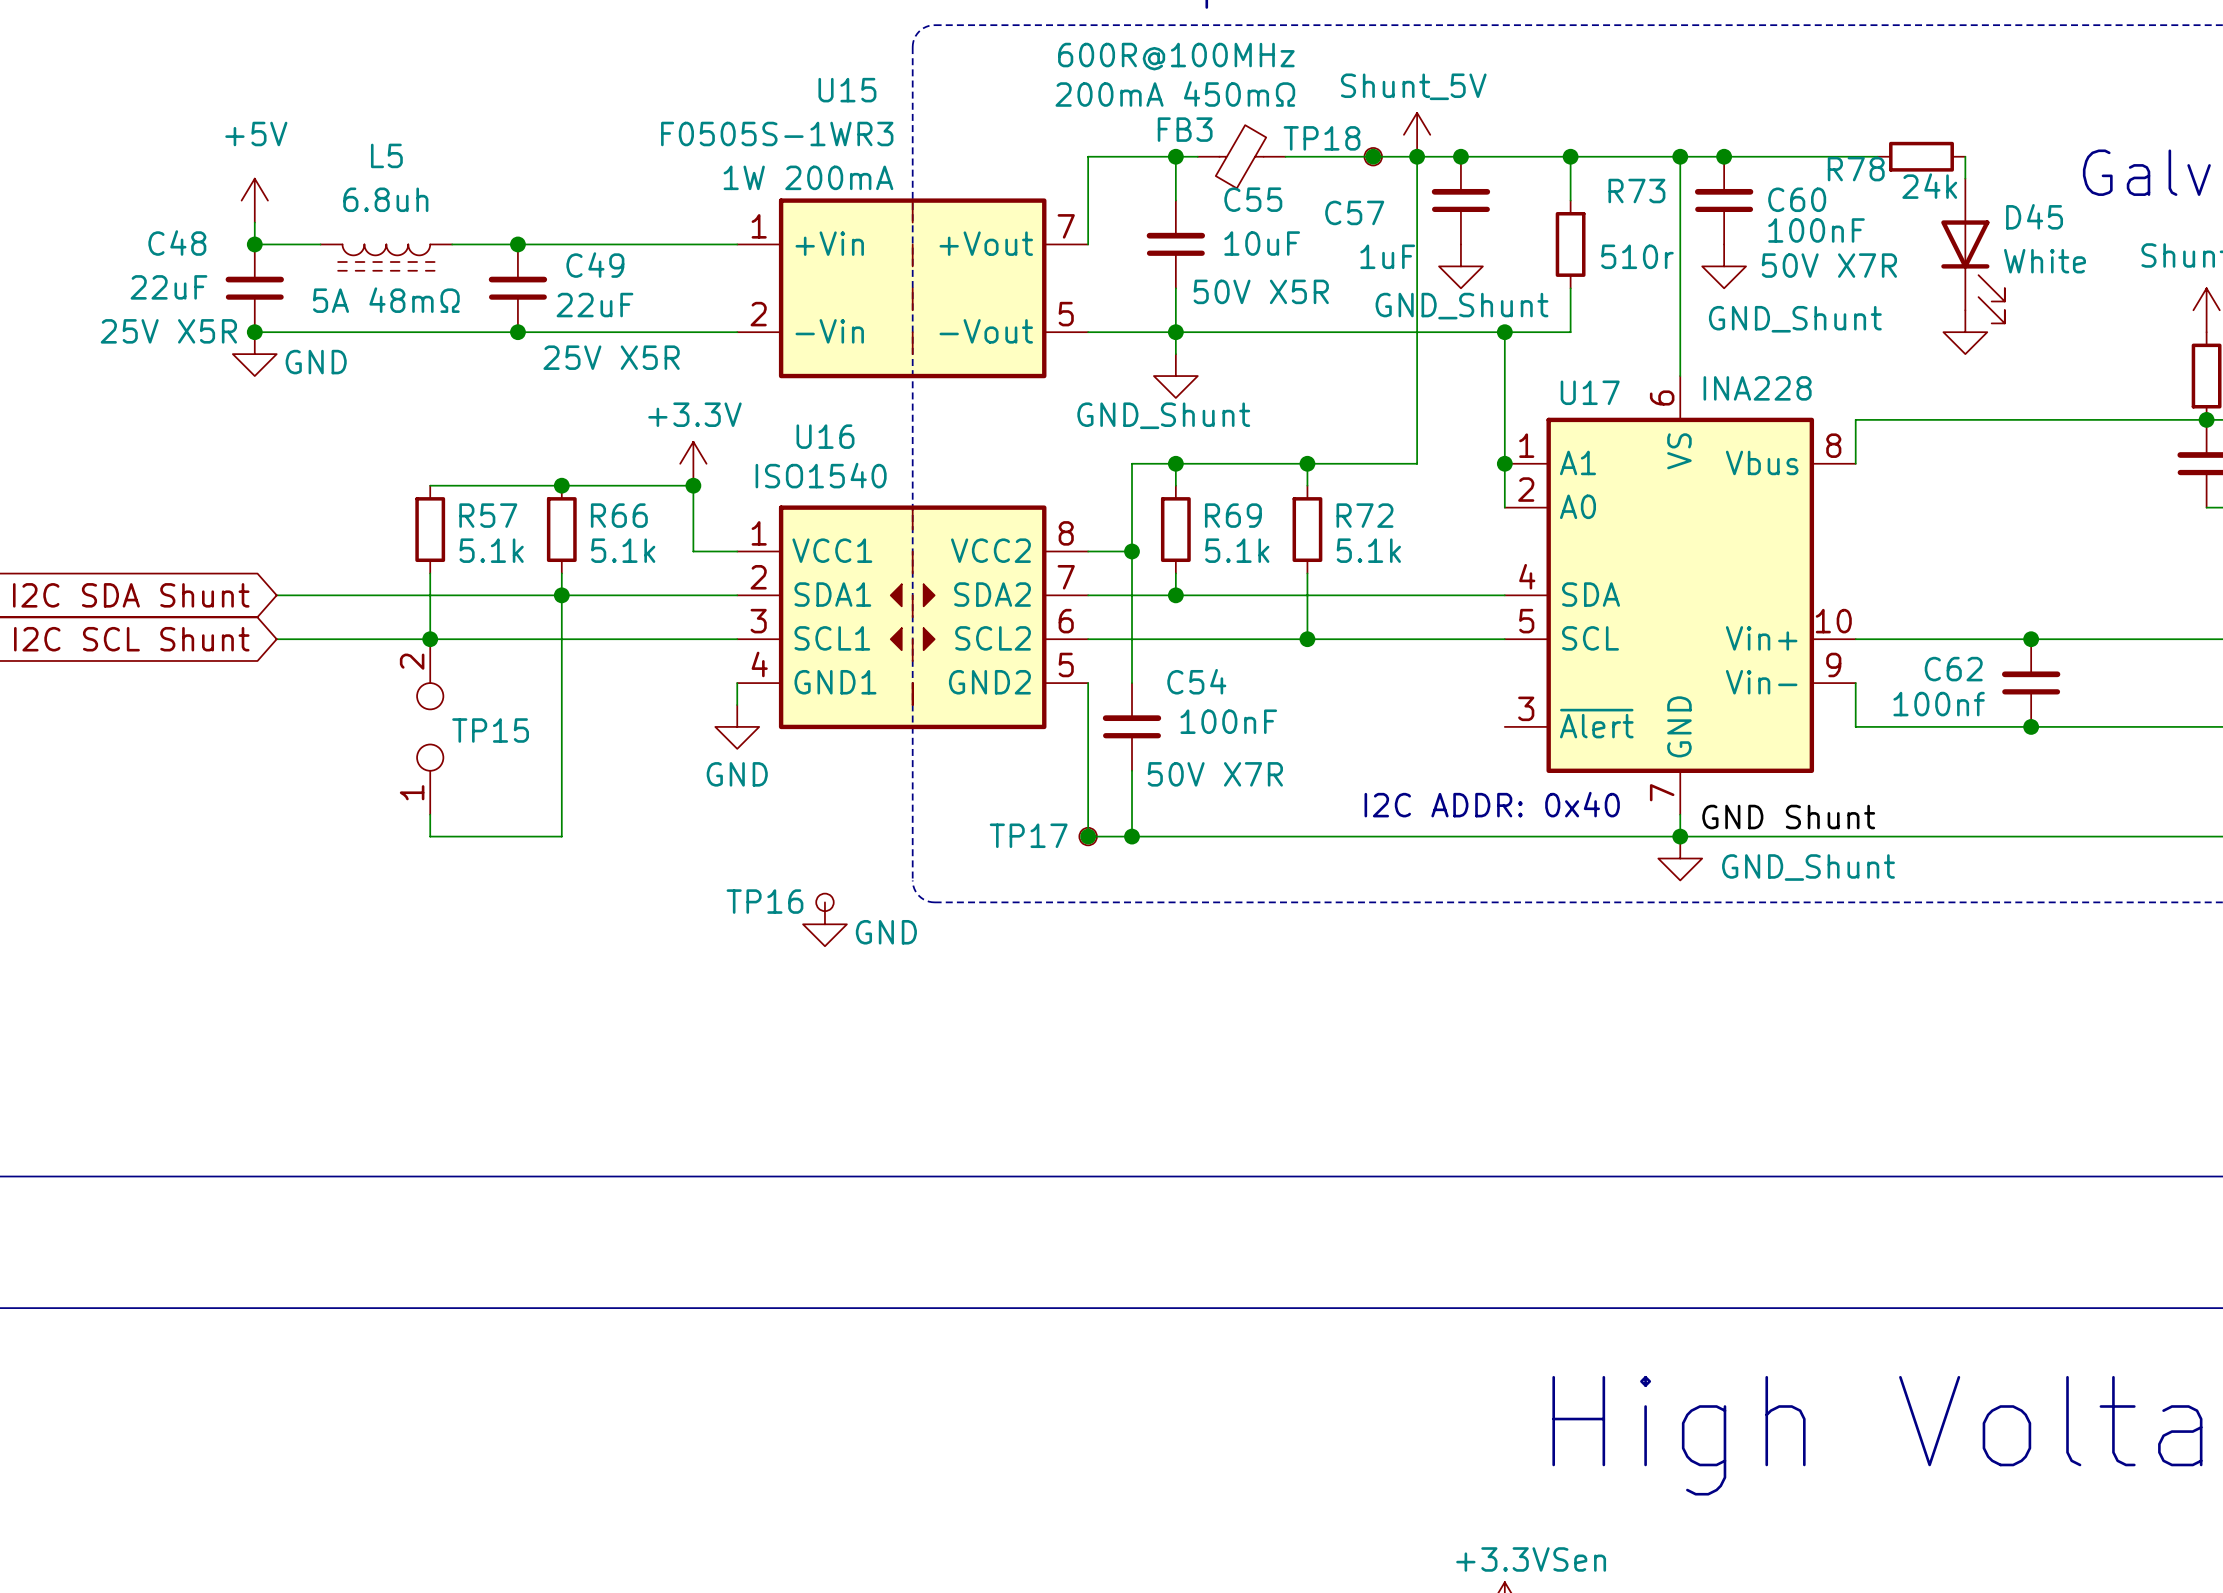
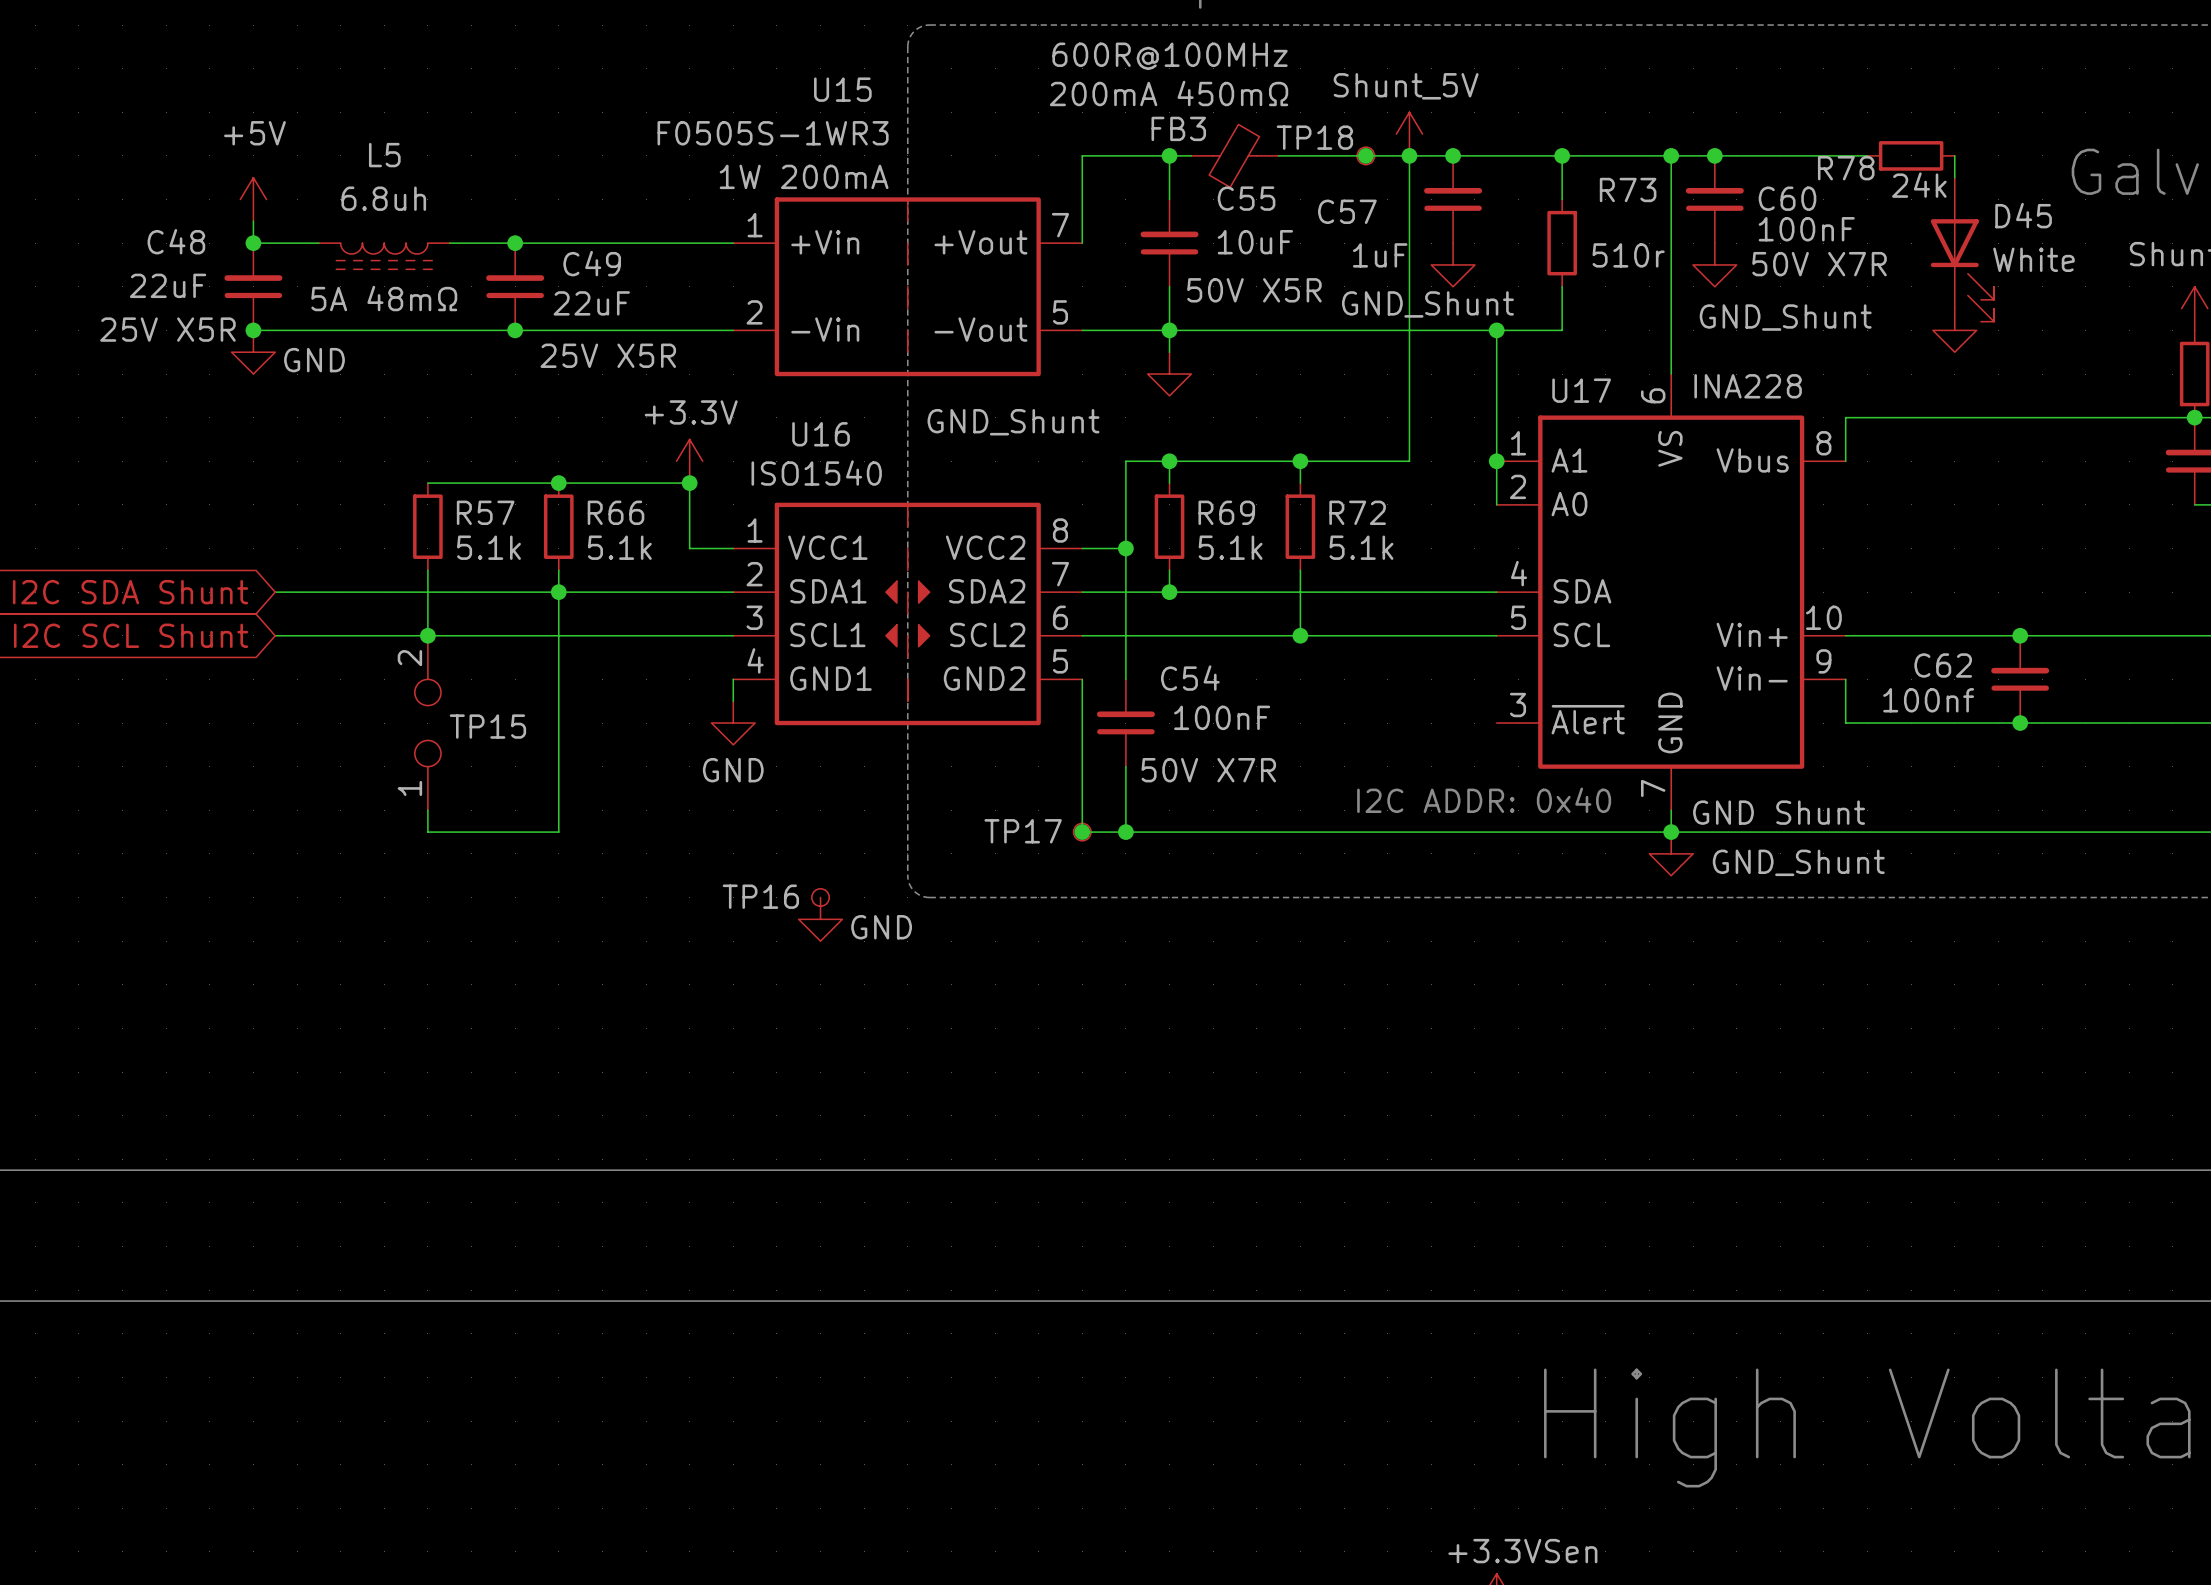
power symbol text position: GND_Shunt (1462, 306) -> GND_Shunt (1427, 304)
power symbol text position: GND_Shunt (1163, 415) -> GND_Shunt (1013, 422)

